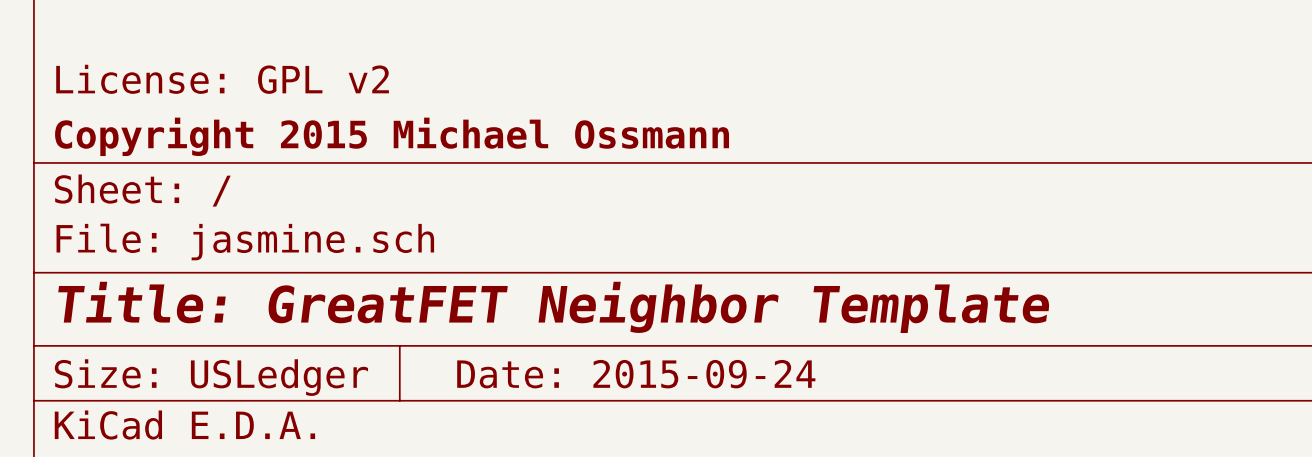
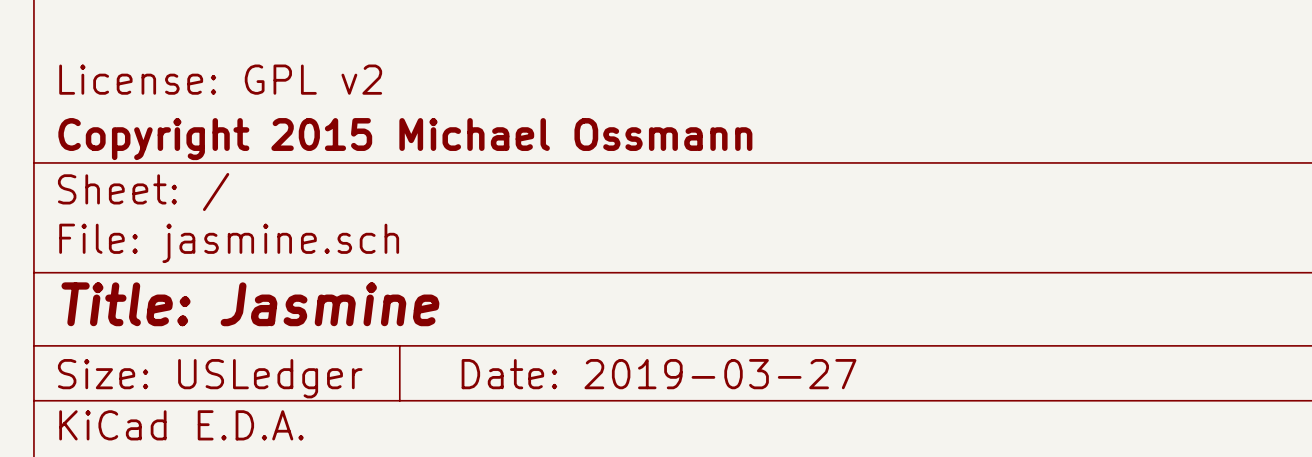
title block: Title: GreatFET Neighbor Template (553, 307) -> Title: Jasmine (250, 304)
title block: Date: 2015-09-24 (636, 374) -> Date: 2019-03-27 (659, 374)

